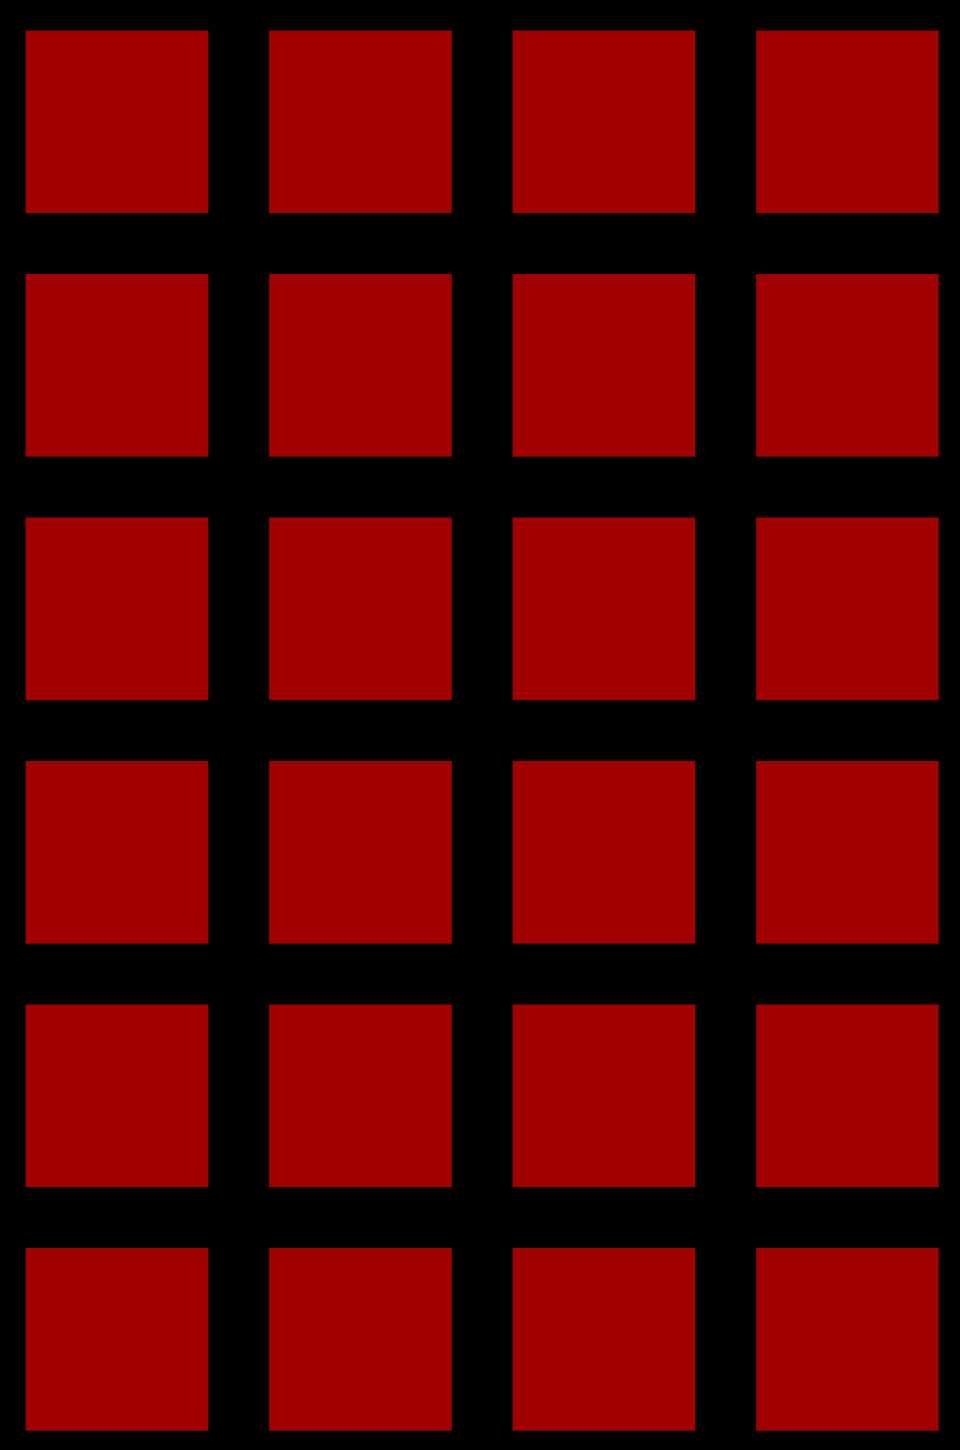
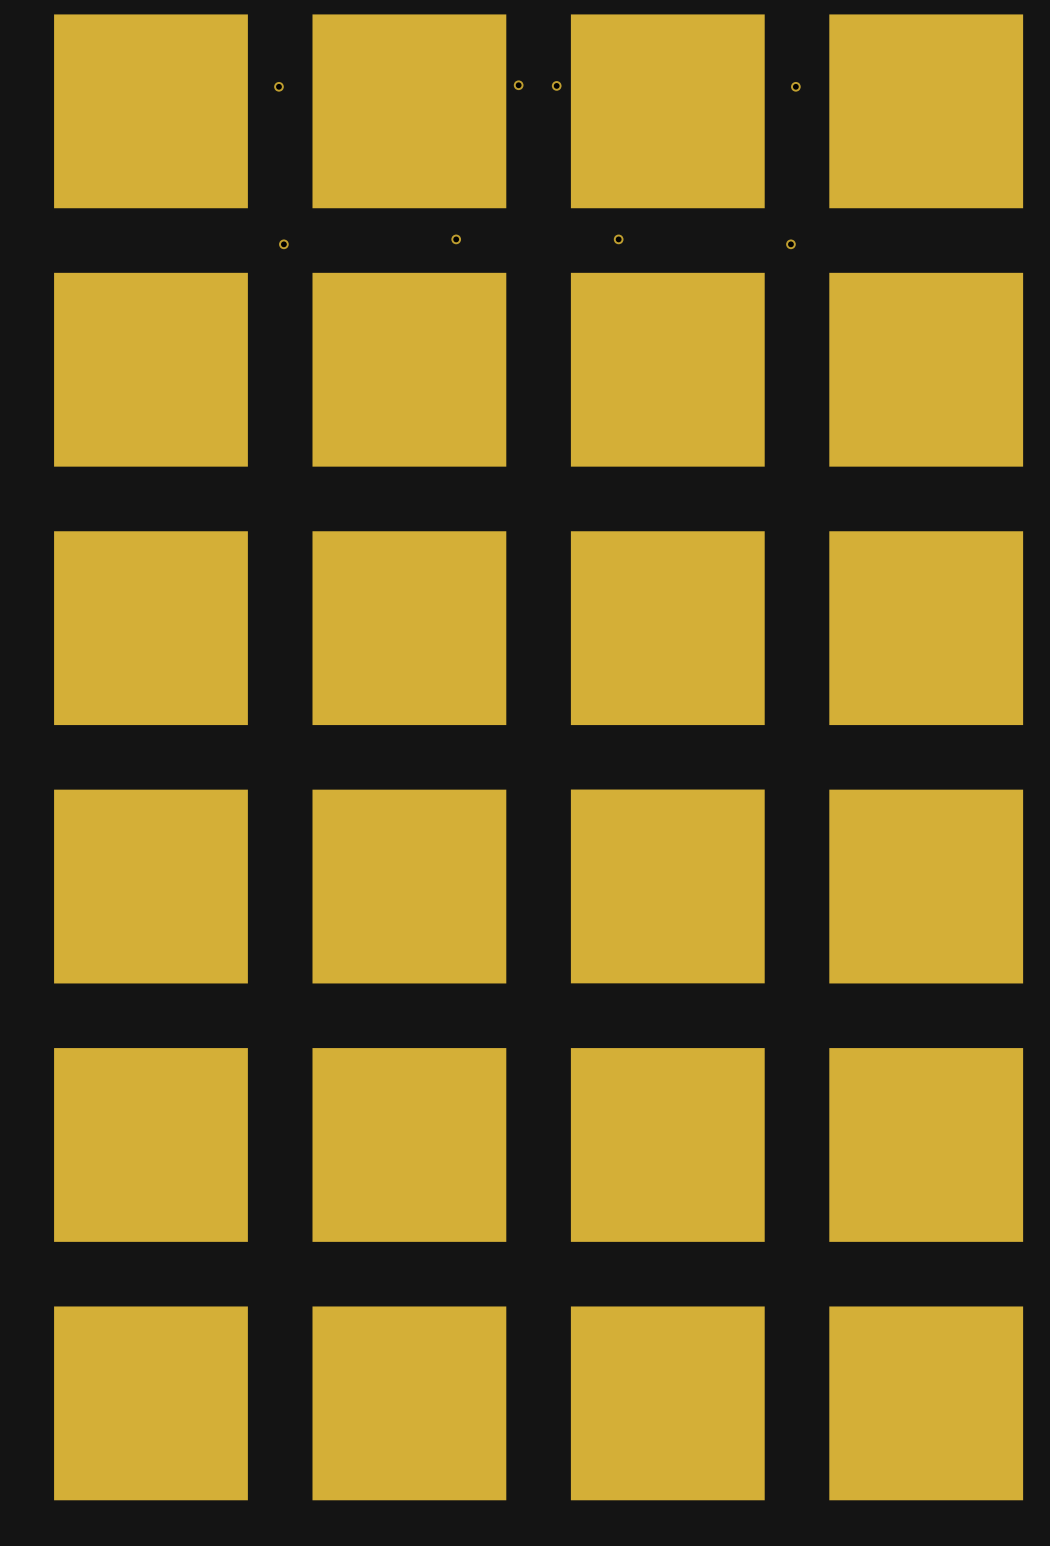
via: none -> (518, 85)
via: none -> (556, 85)
via: none -> (278, 86)
via: none -> (795, 86)
via: none -> (456, 239)
via: none -> (618, 239)
via: none -> (283, 244)
via: none -> (790, 244)

